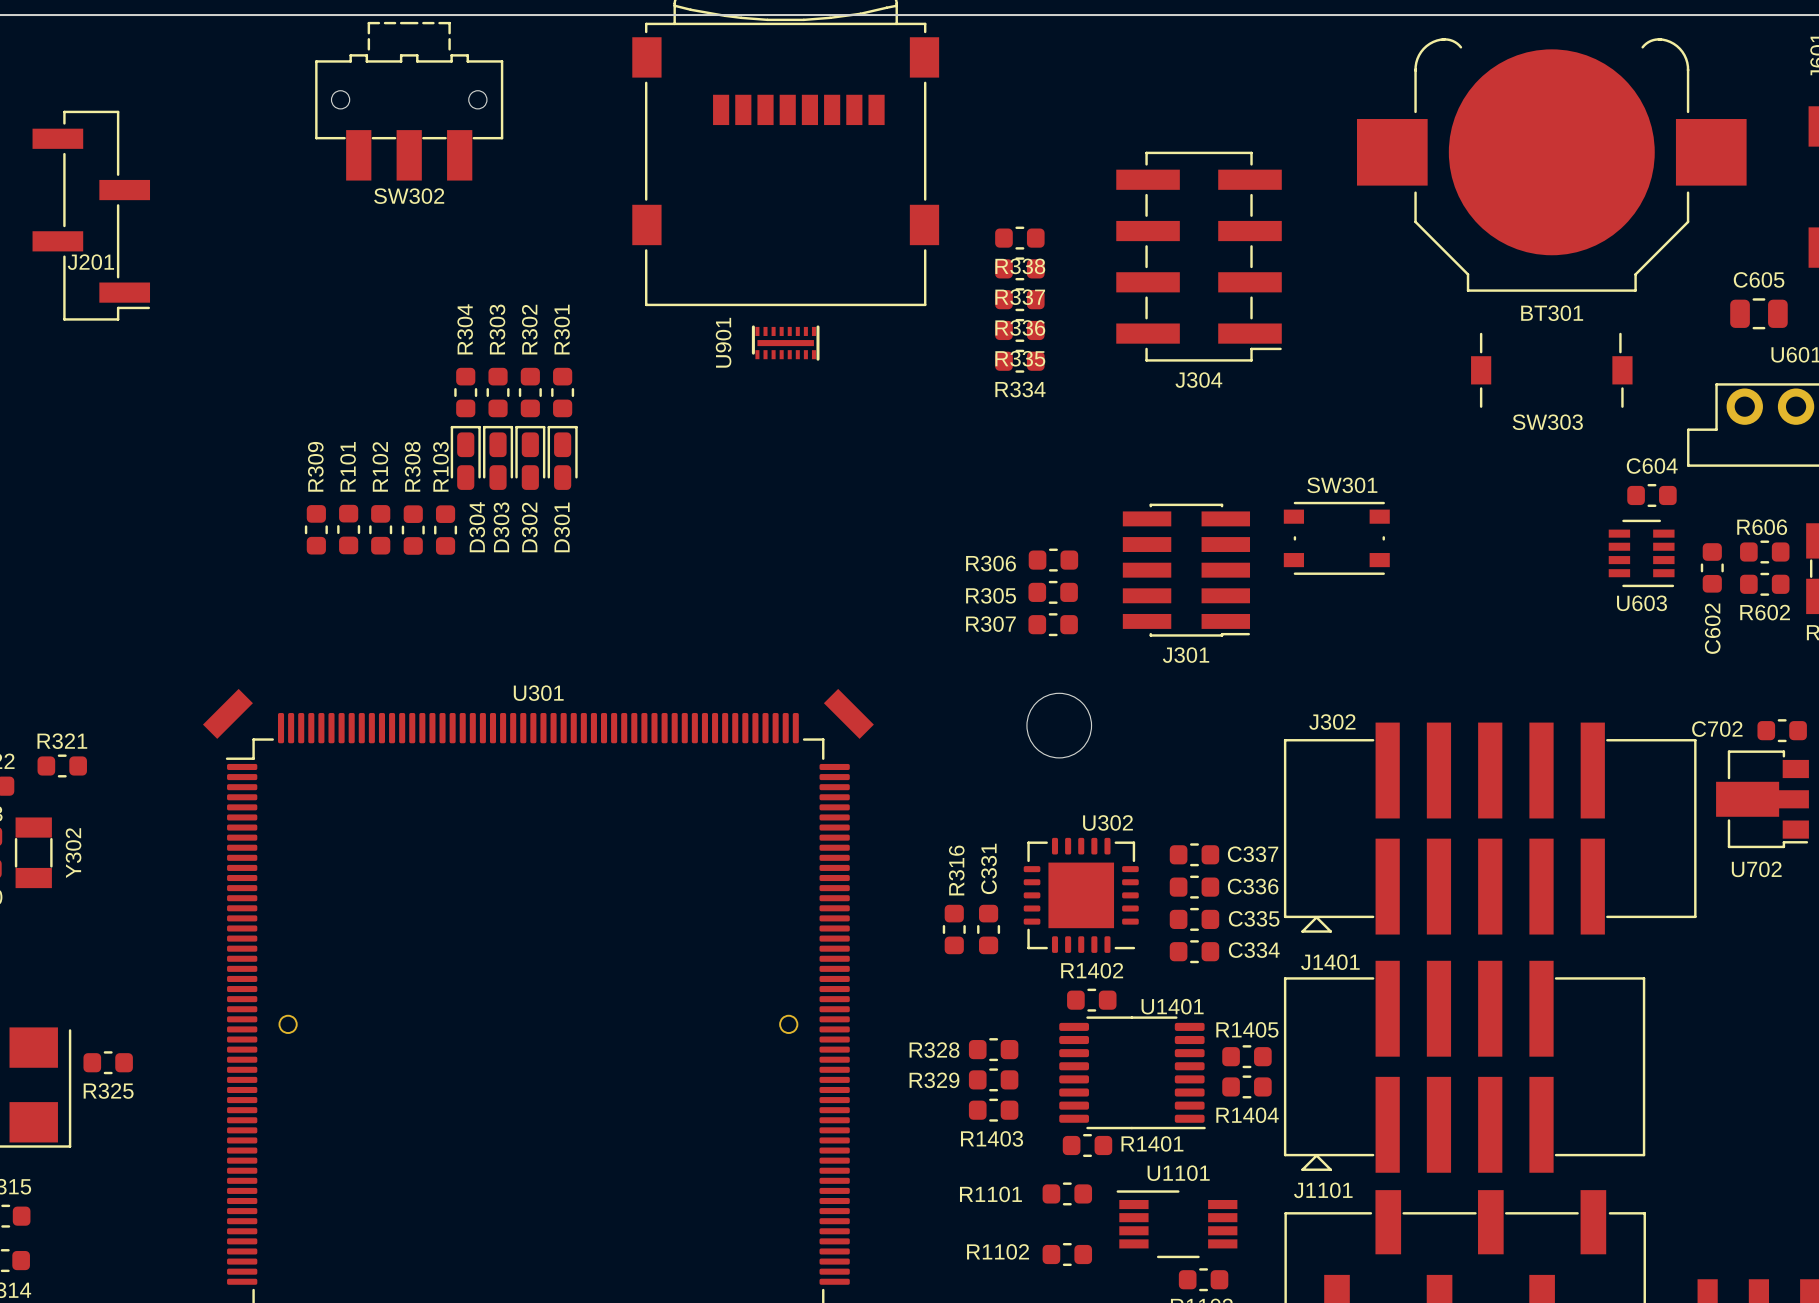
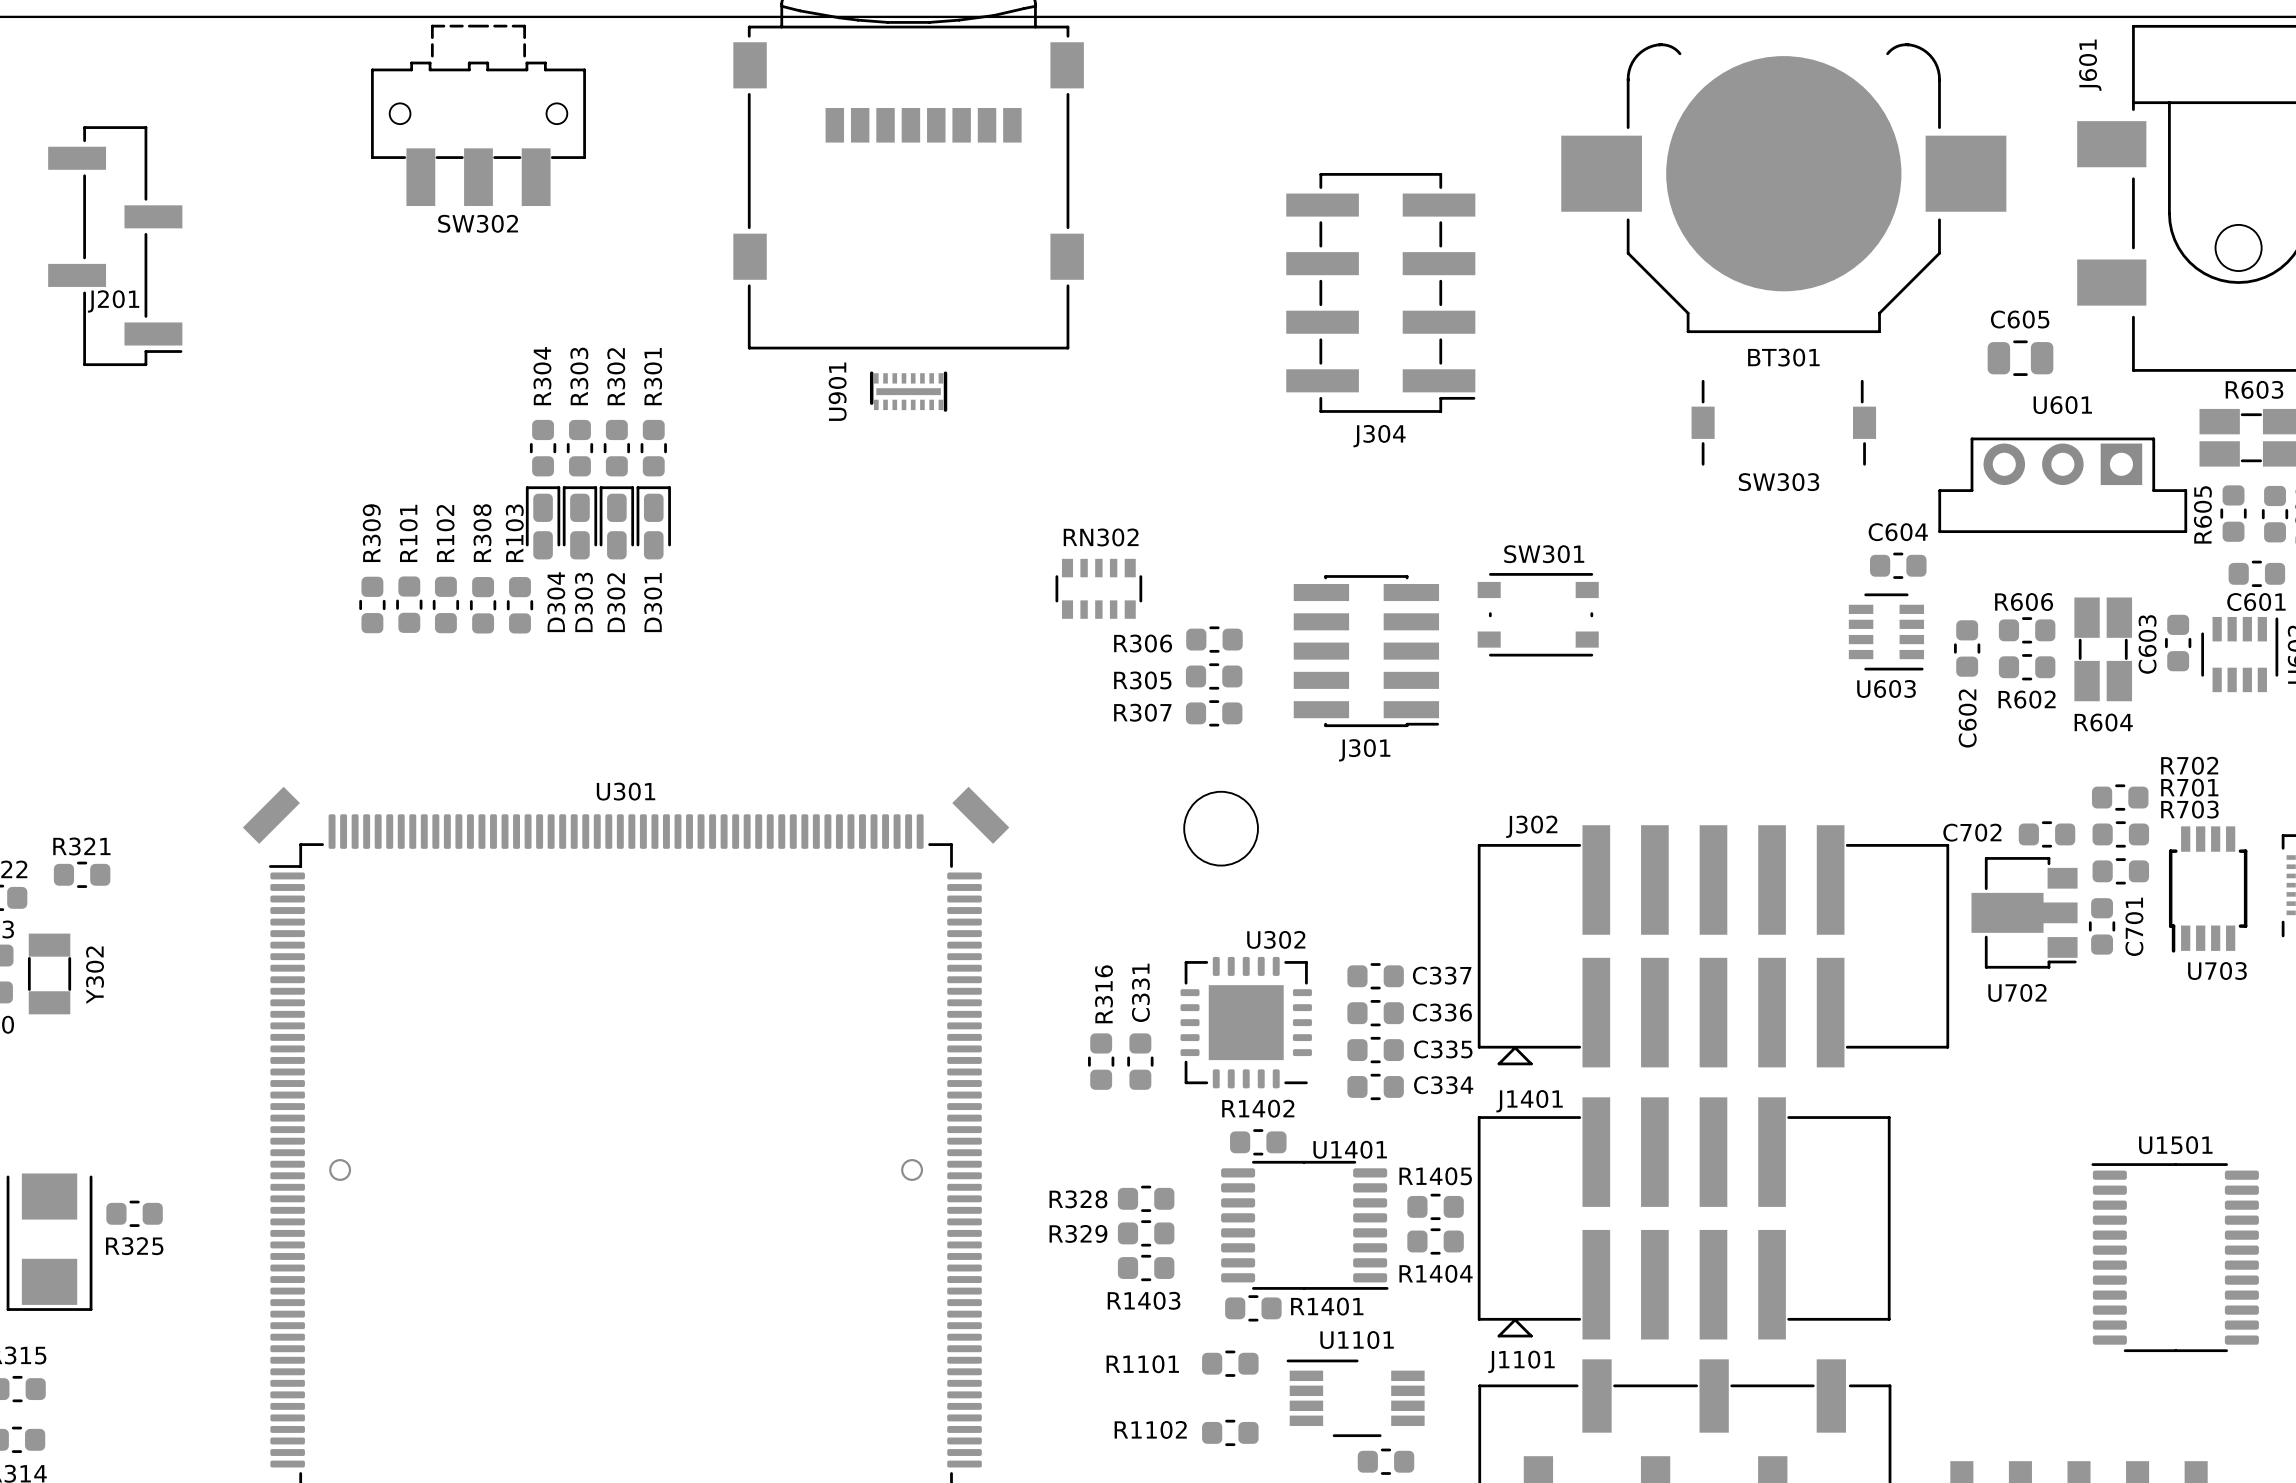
R338: (1019, 238) -> none
R337: (1019, 268) -> none
R336: (1019, 299) -> none
R335: (1019, 330) -> none
R334: (1019, 361) -> none
RN302: none -> (1098, 588)

